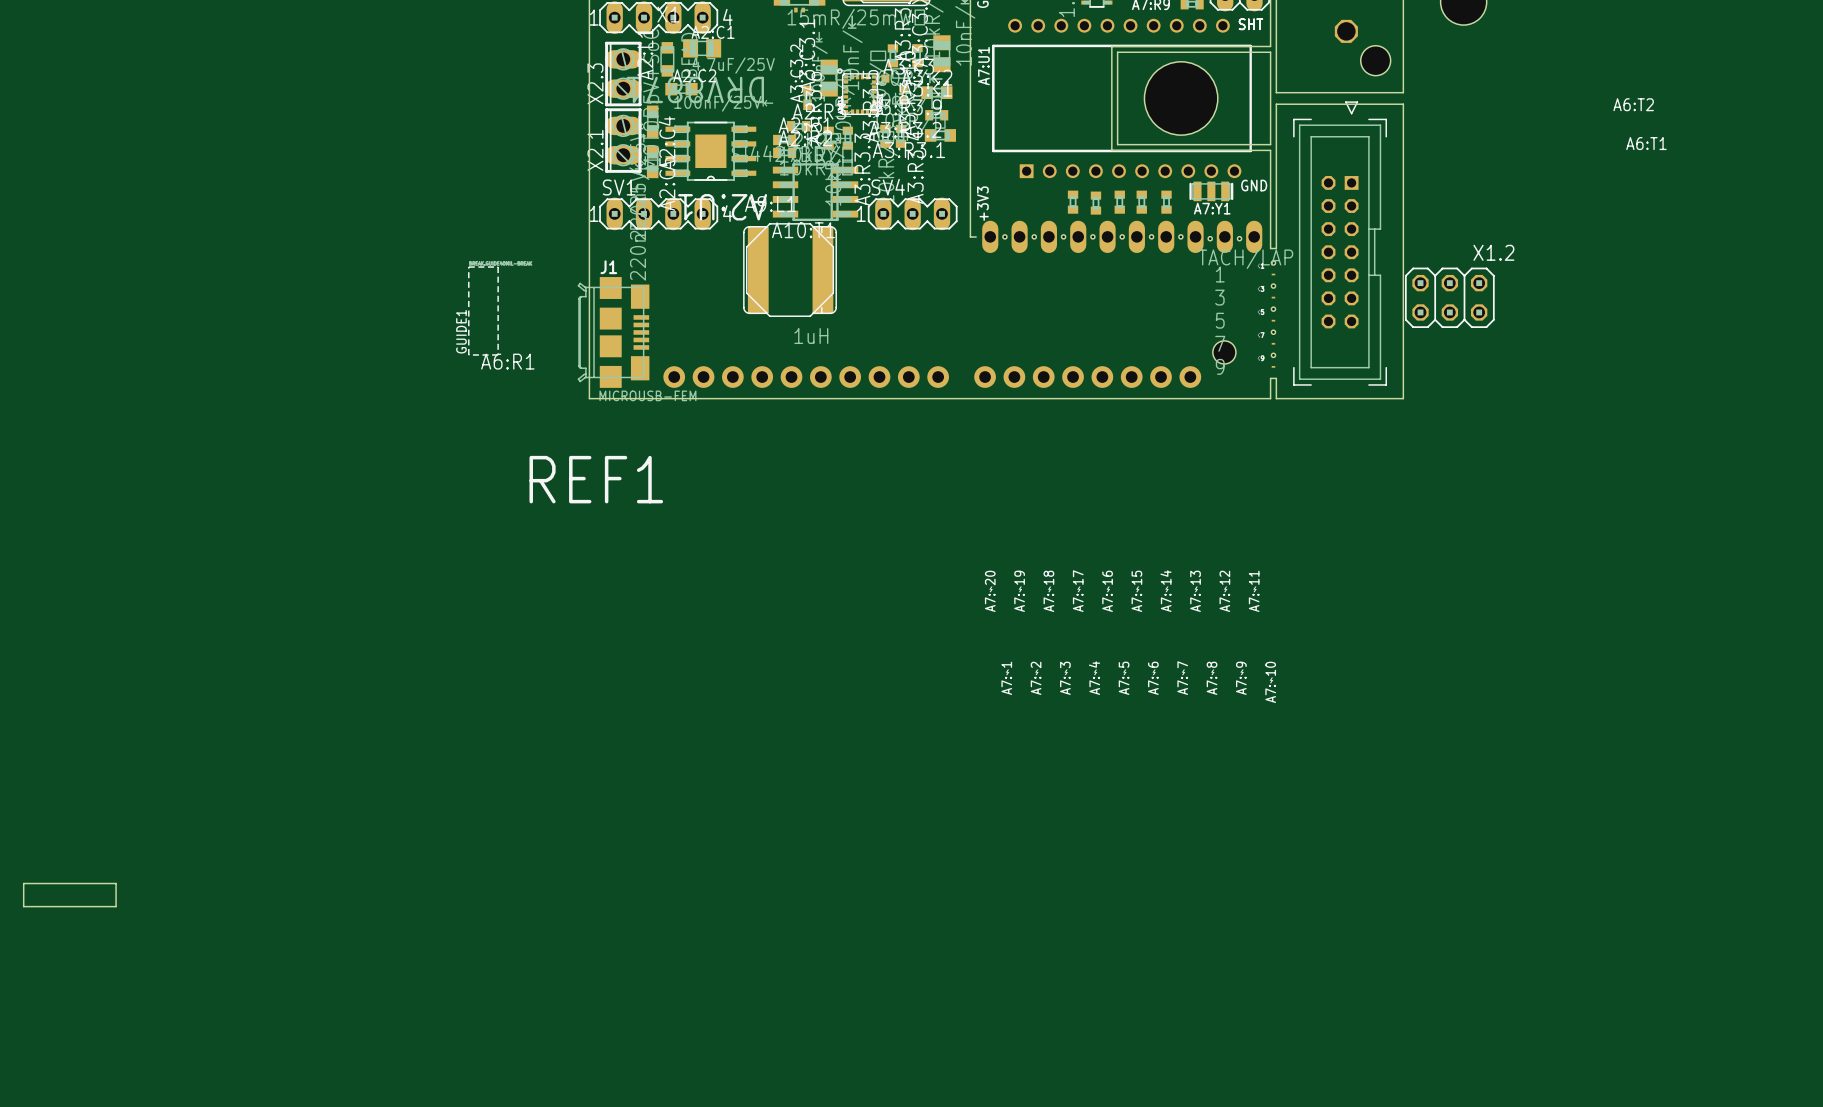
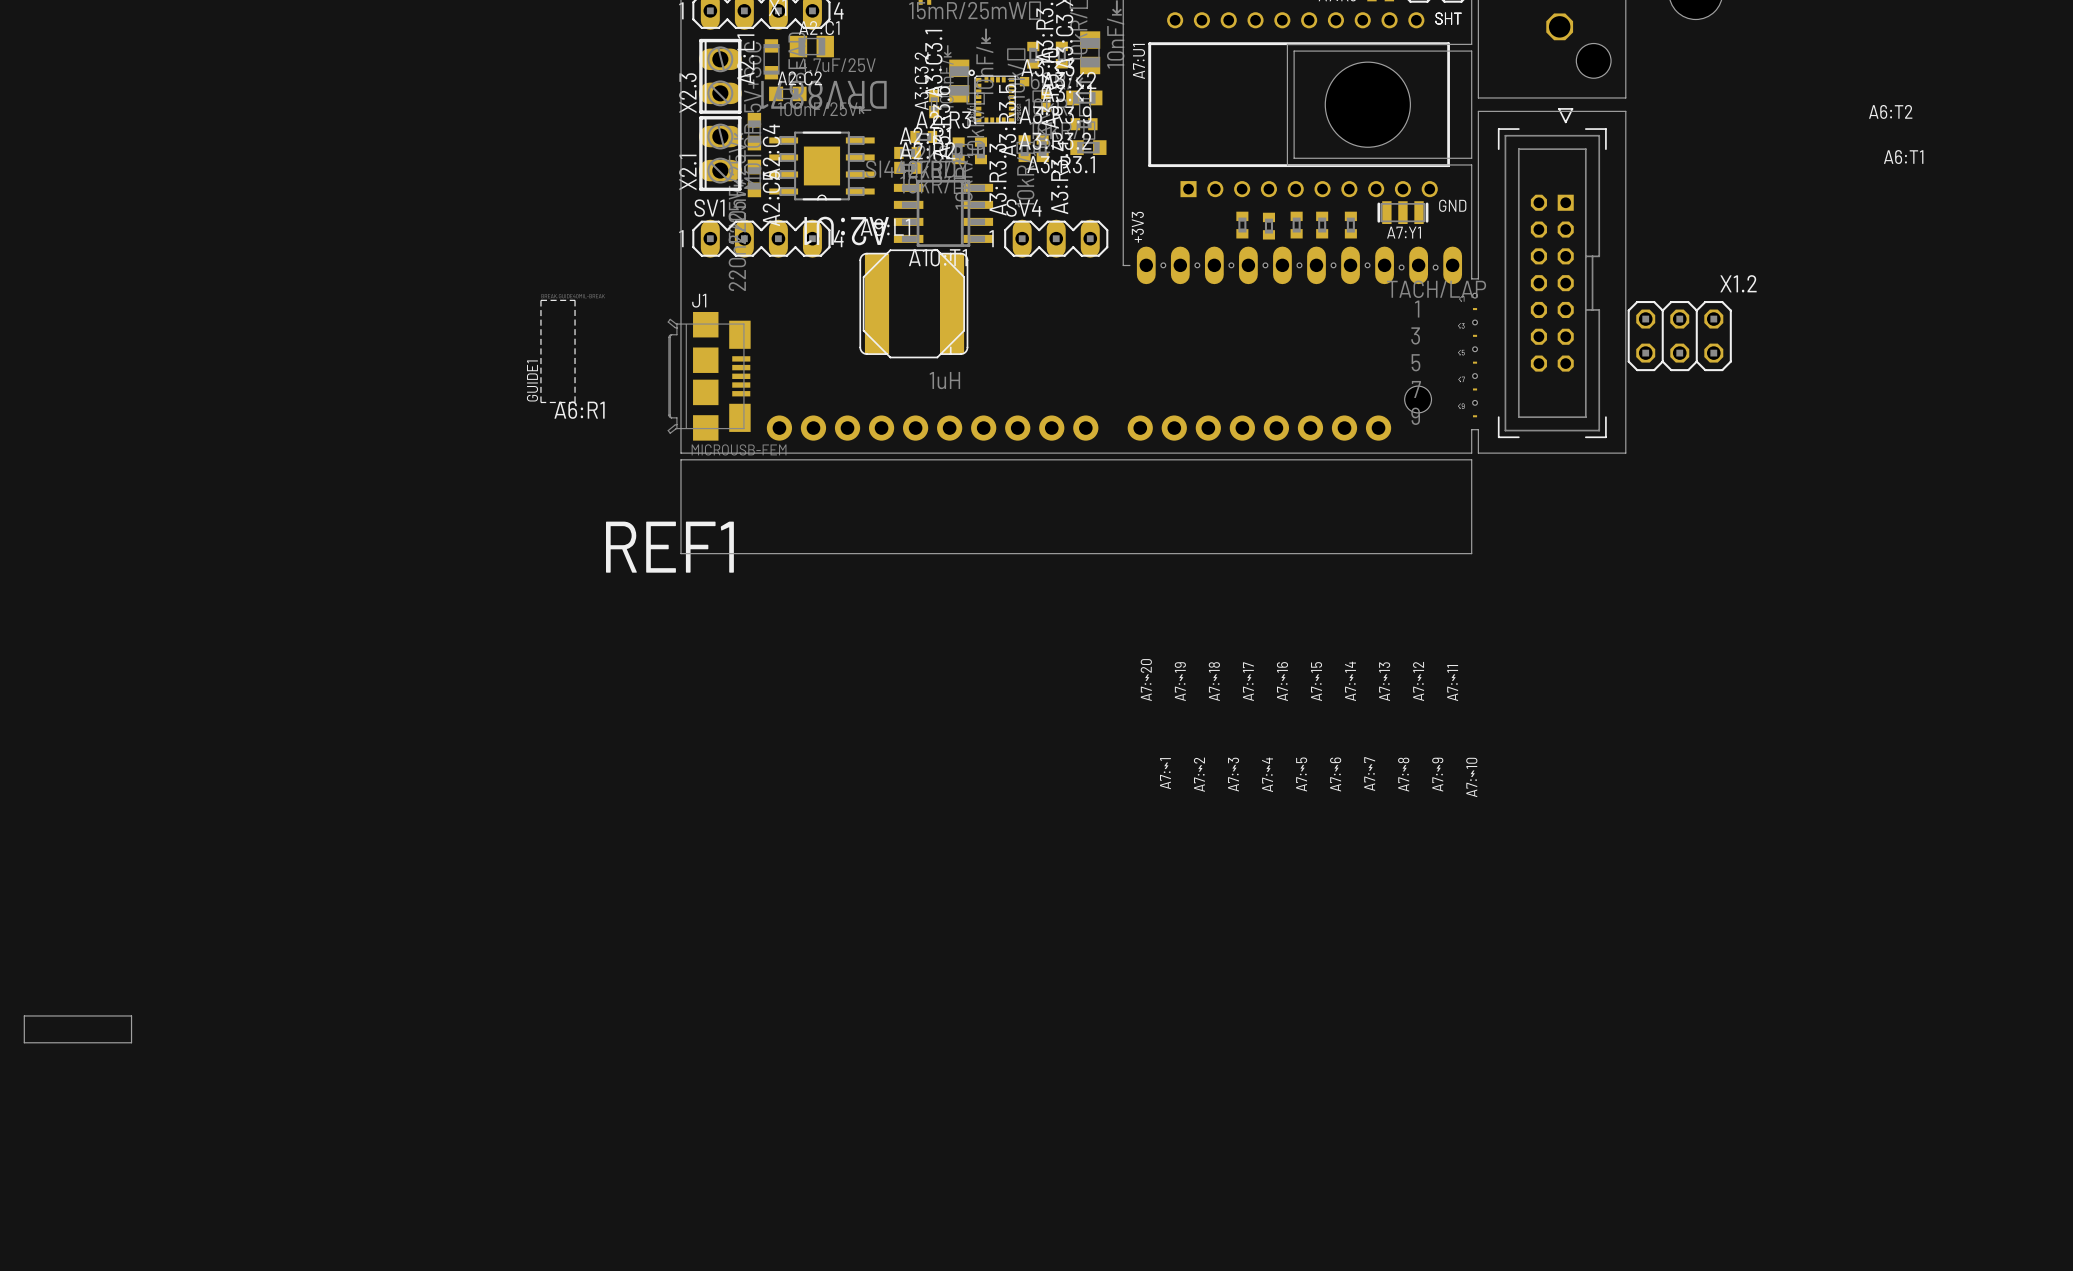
board edge: none -> (680, 459) (680, 553) (1471, 553) (1471, 459) (680, 459)

